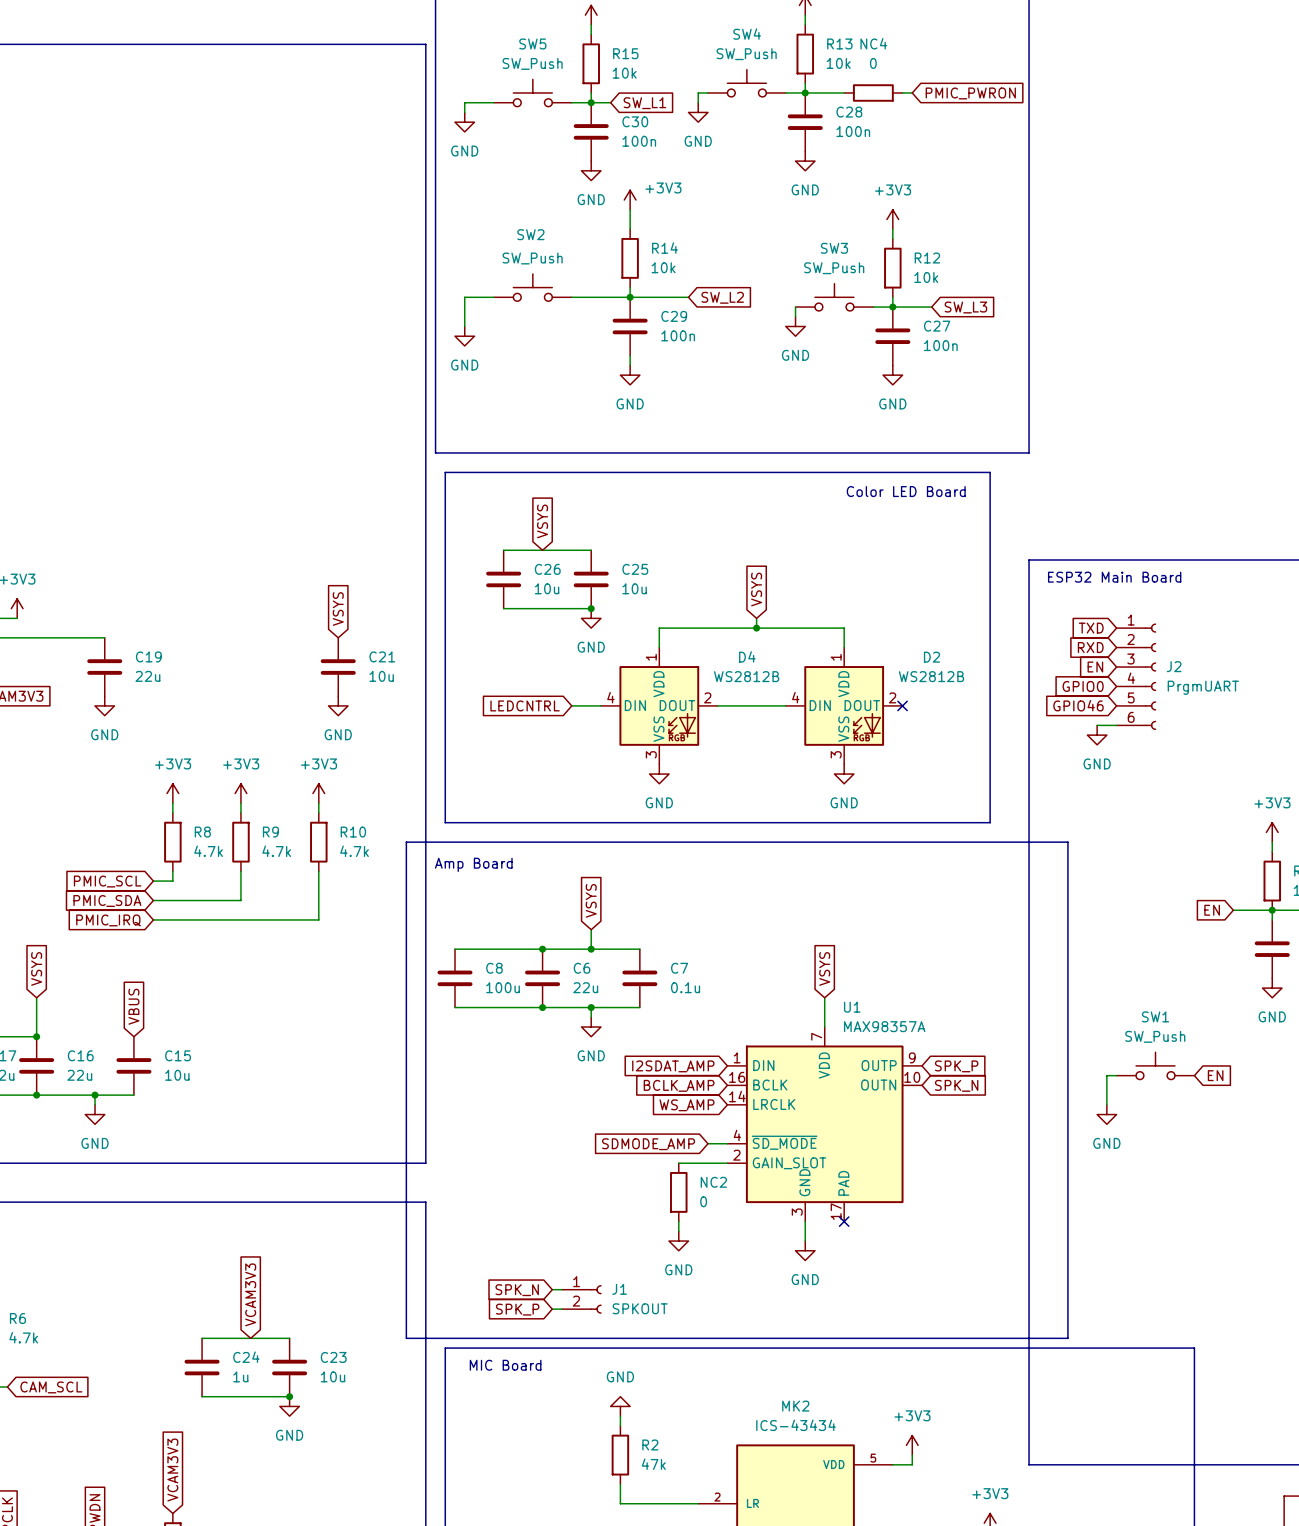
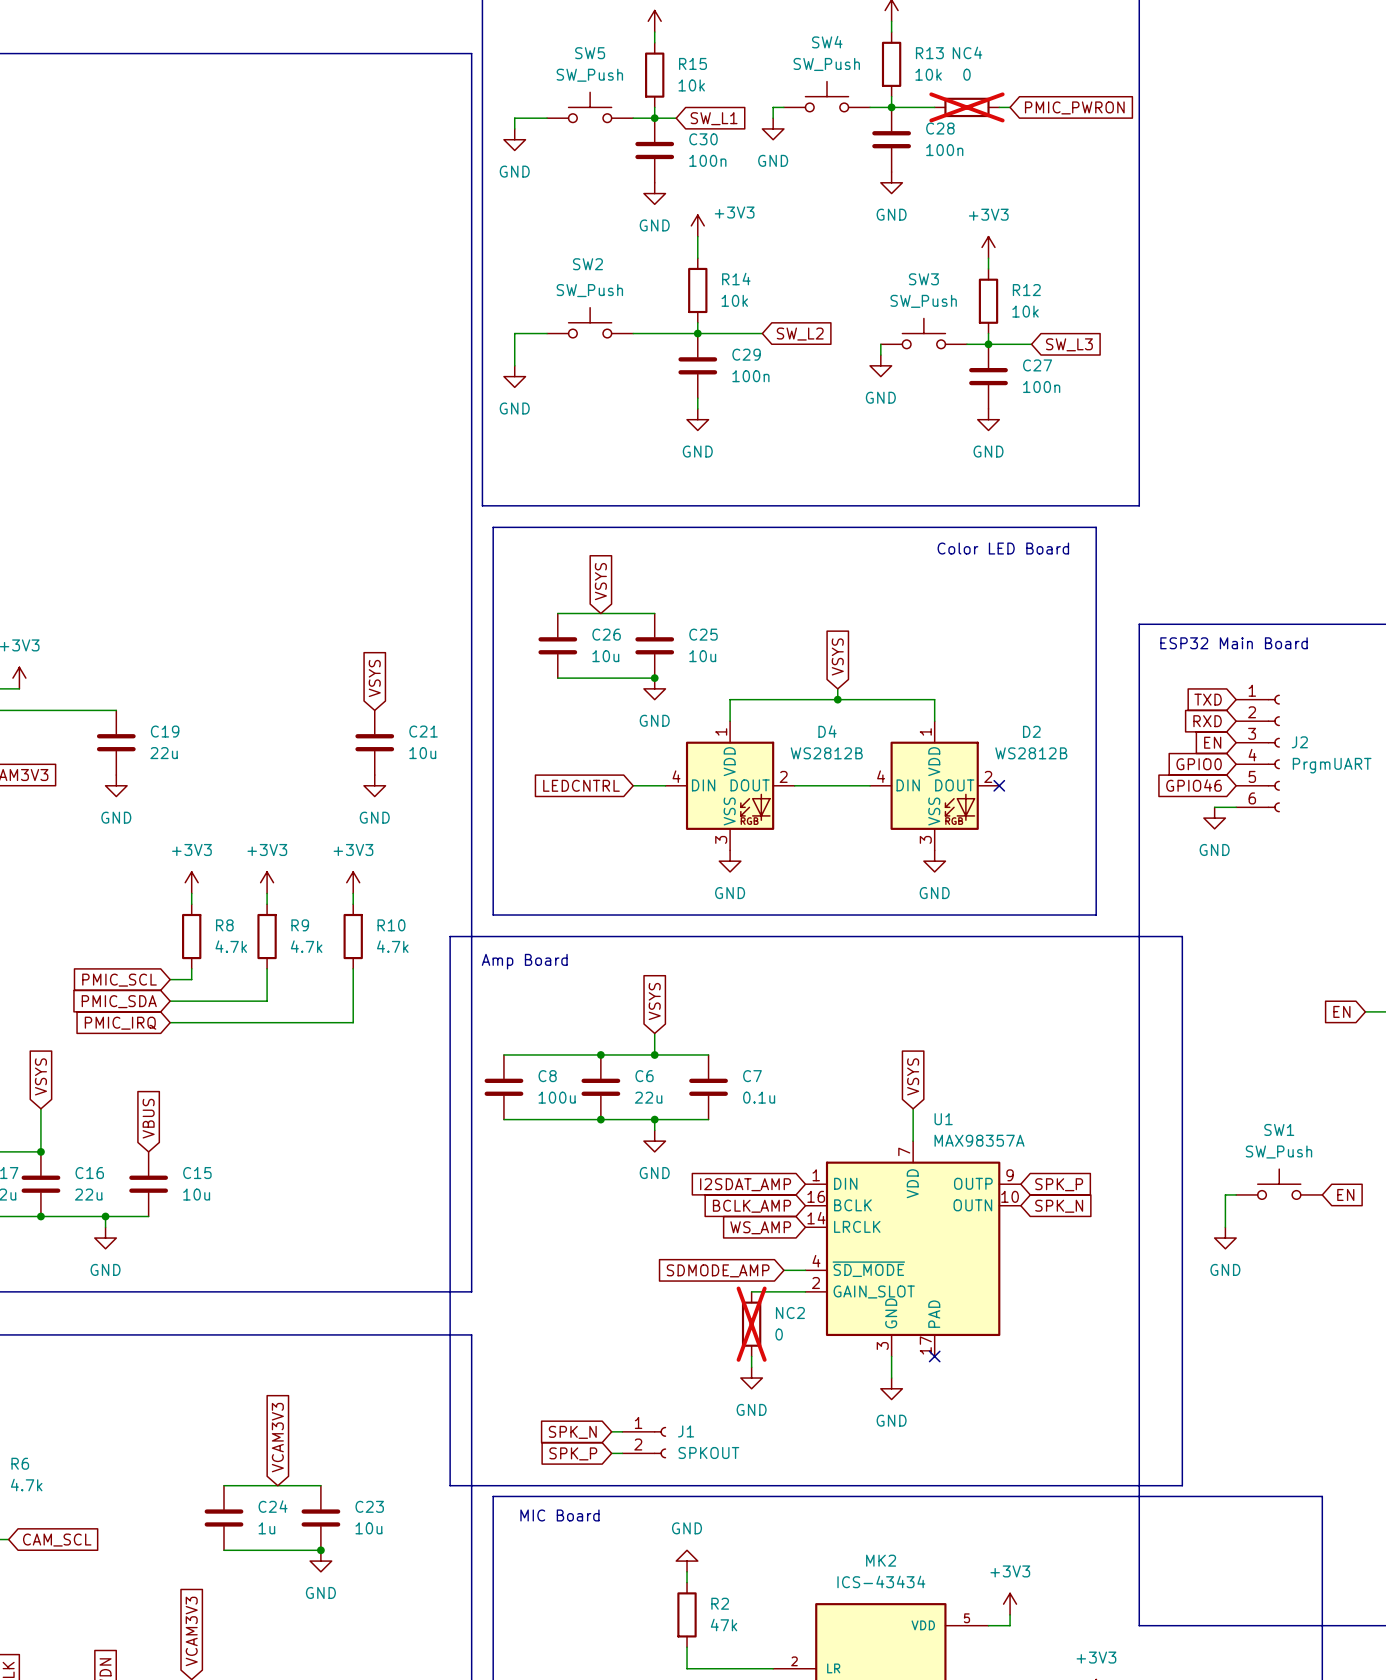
NC4 do-not-place cross: none -> (966, 107)
NC2 do-not-place cross: none -> (751, 1324)

